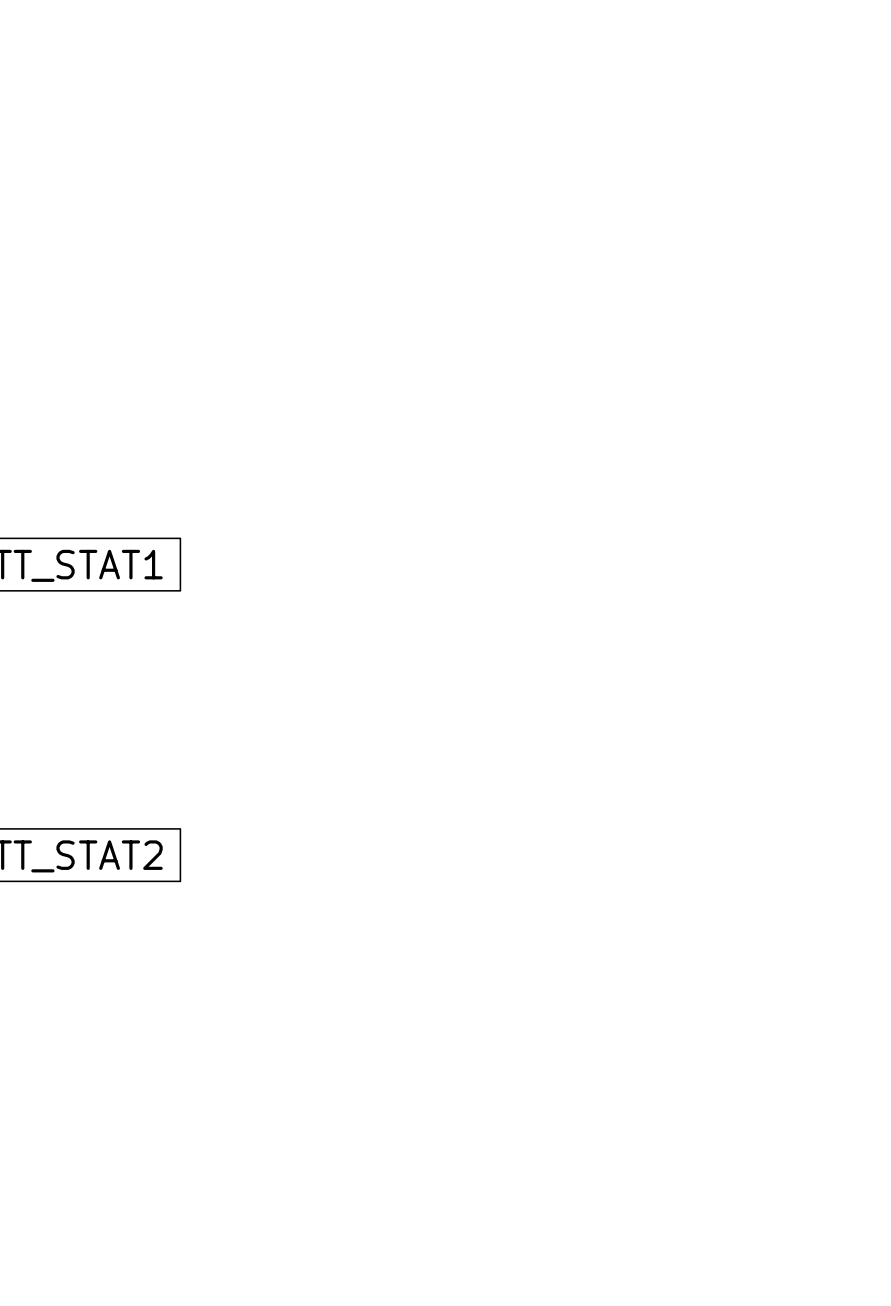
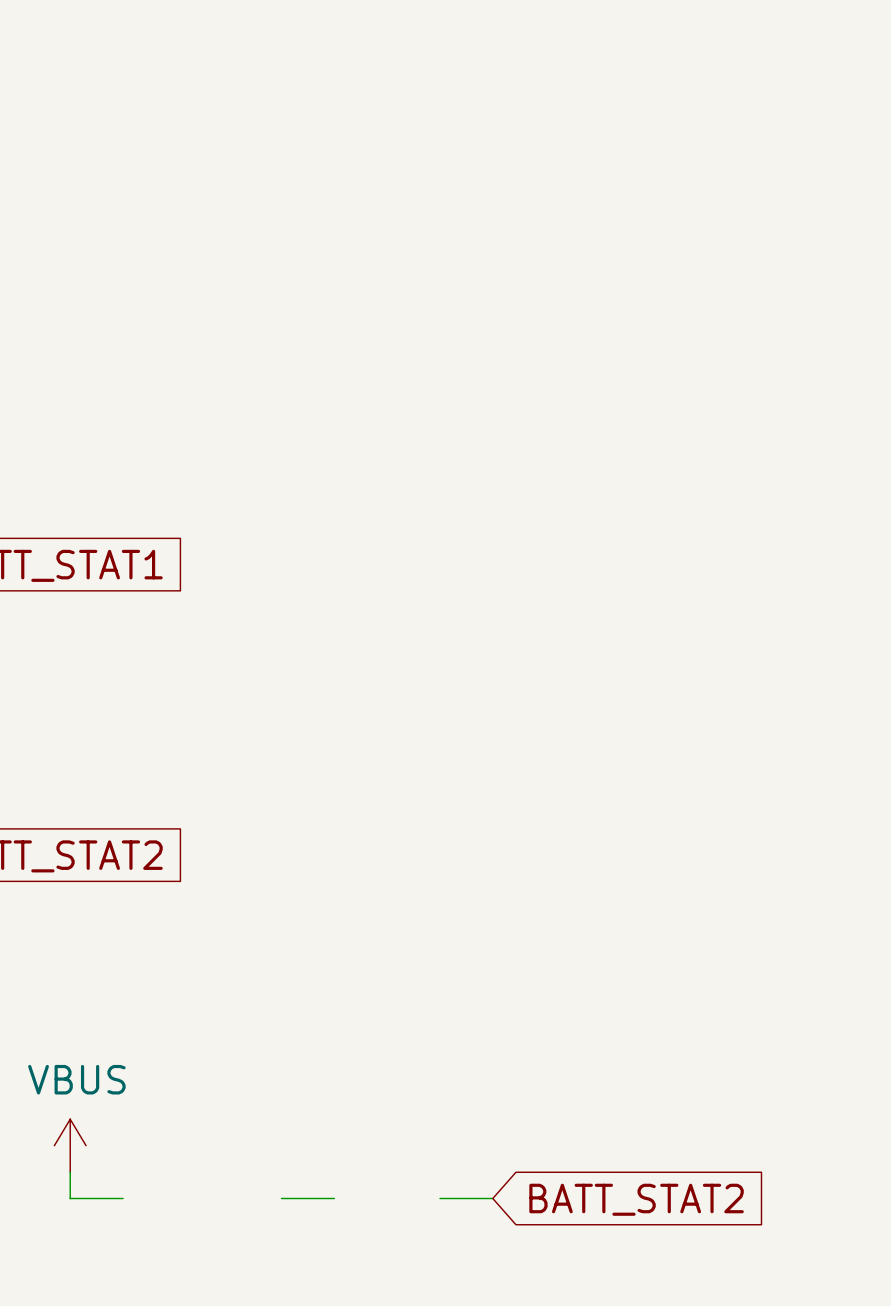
power symbol: none -> VBUS (70, 1145)
wire: none -> (70, 1172) (70, 1198) (123, 1198)
wire: none -> (281, 1198) (334, 1198)
wire: none -> (440, 1198) (492, 1198)
global label: none -> BATT_STAT2 (636, 1199)

